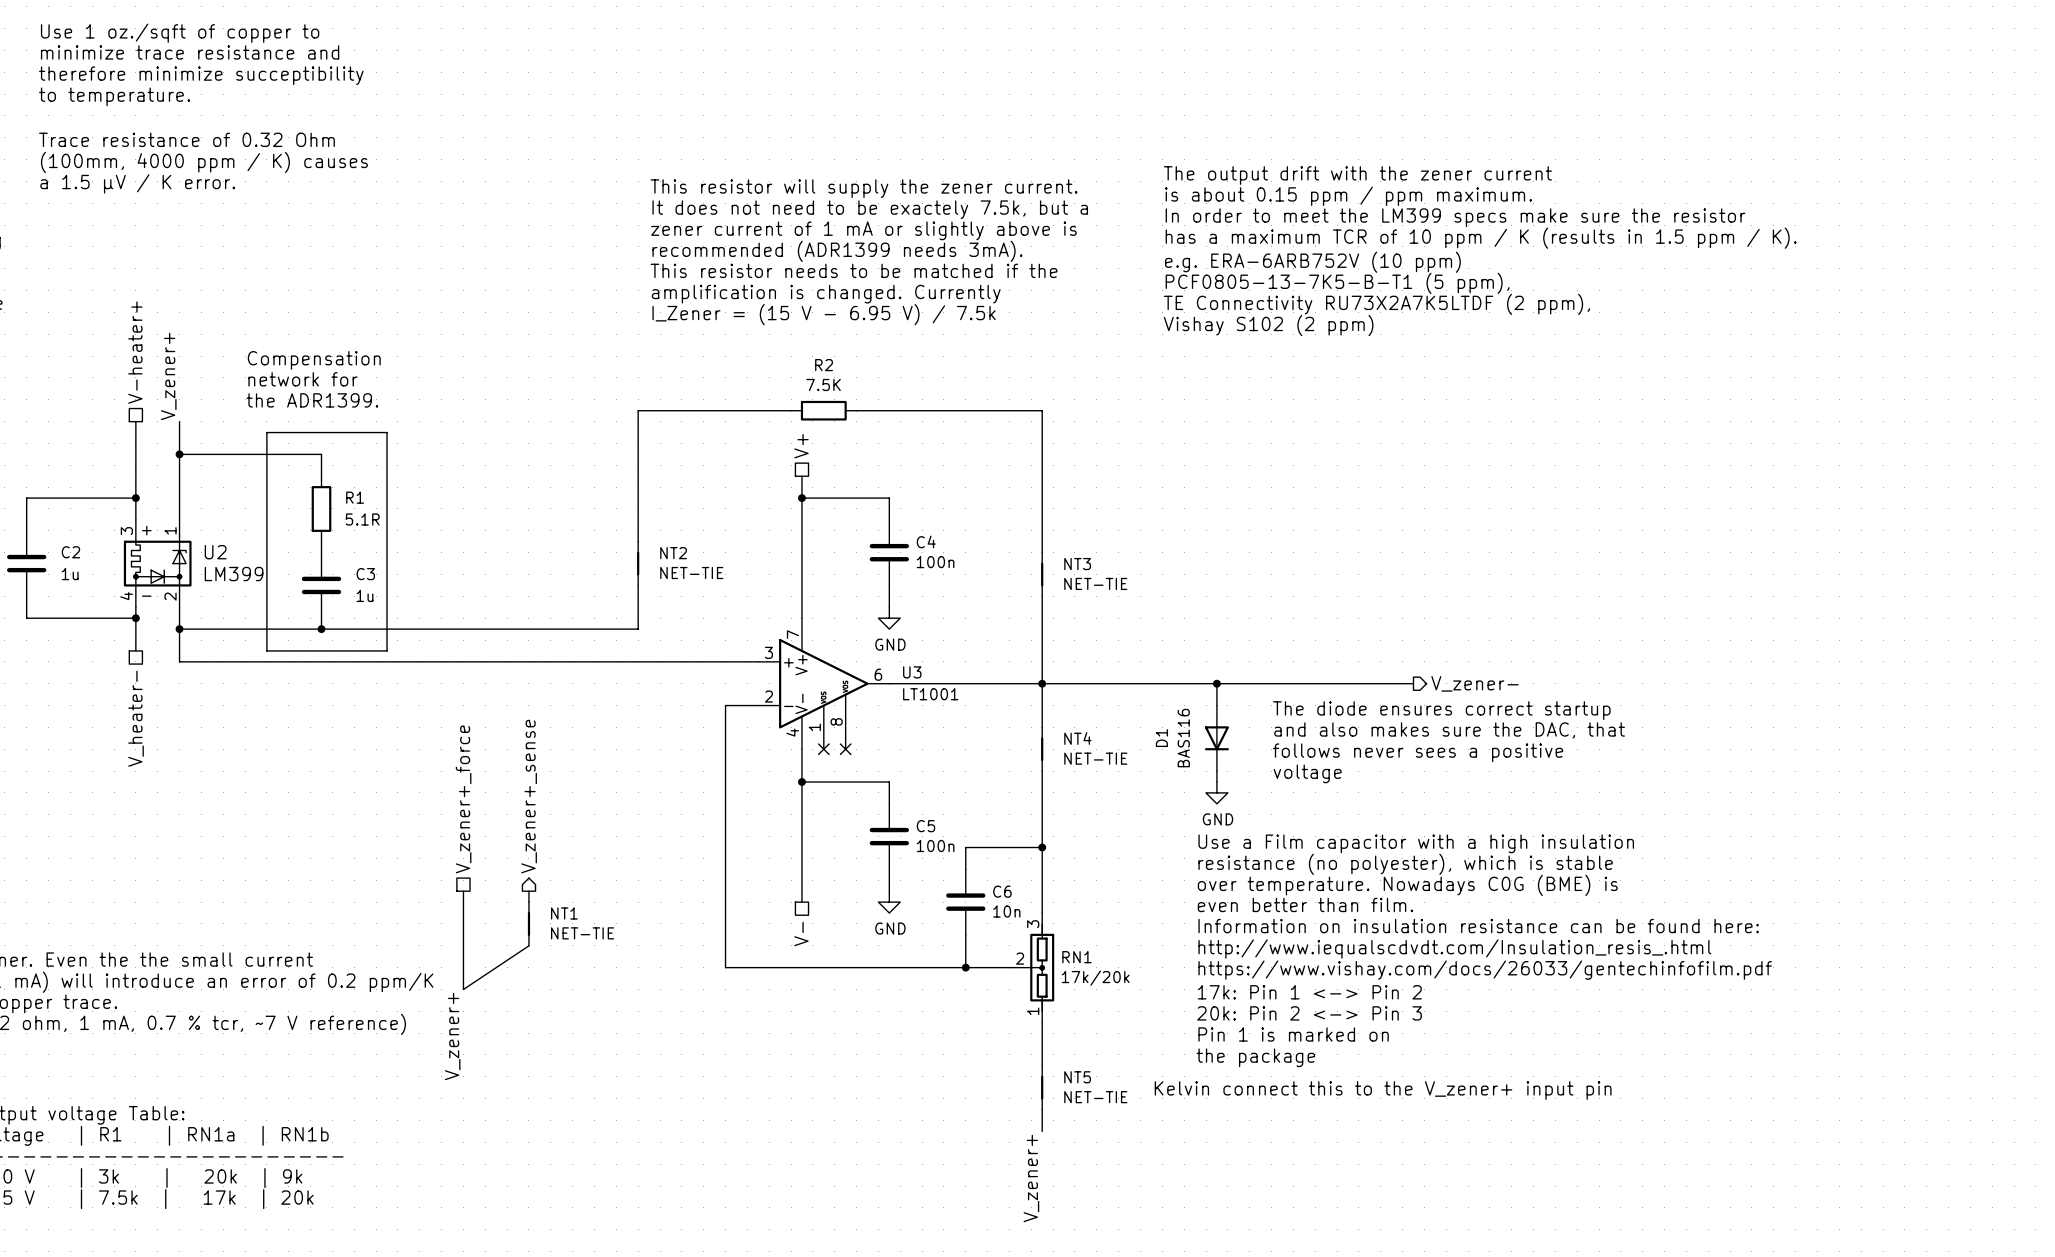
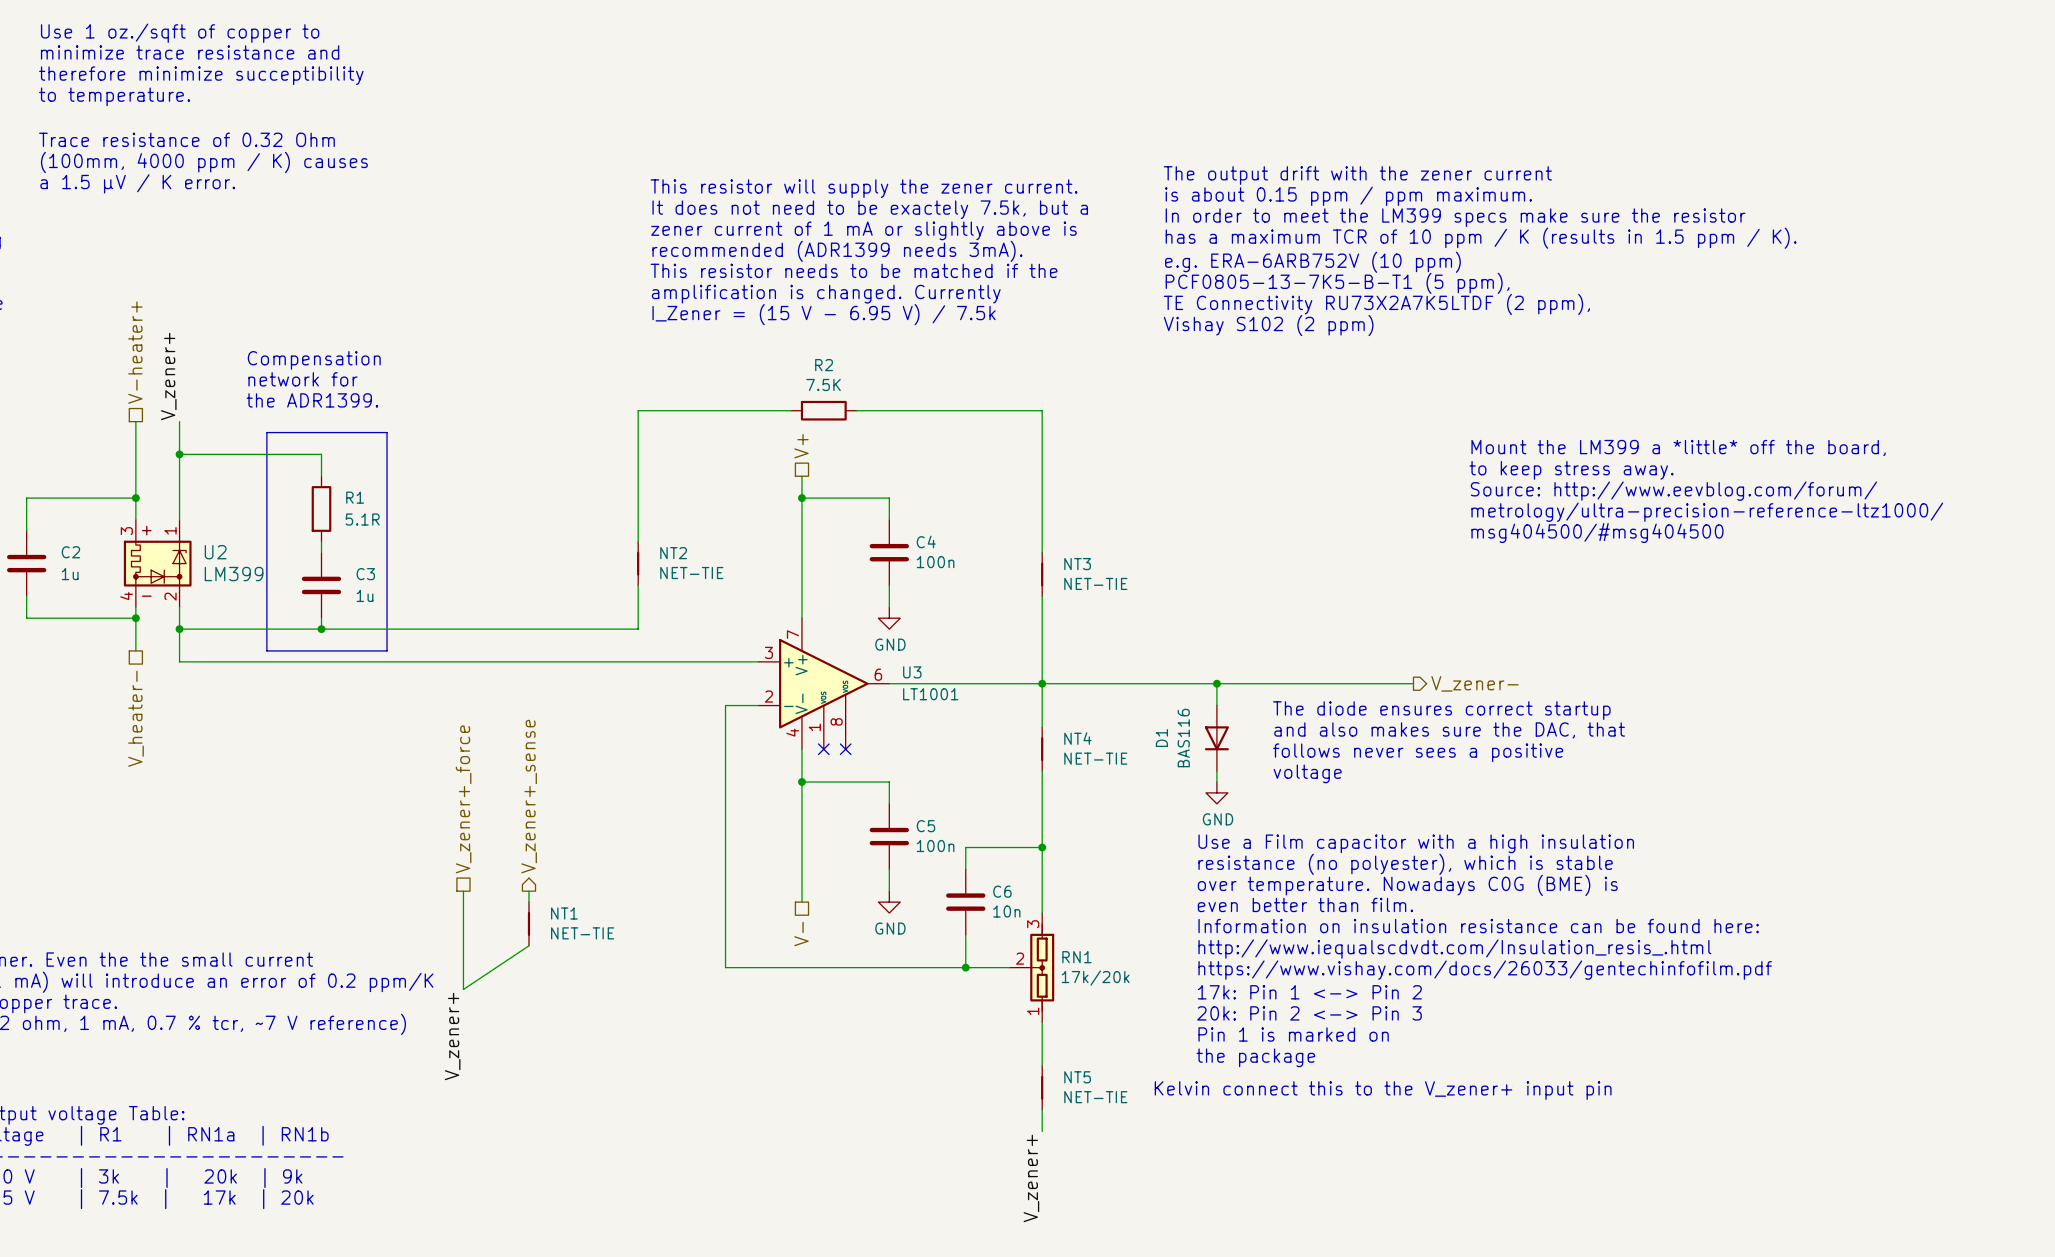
text: none -> Mount the LM399 a *little* off the board, (1678, 448)
text: none -> to keep stress away. (1571, 470)
text: none -> Source: http://www.eevblog.com/forum/ (1673, 491)
text: none -> metrology/ultra-precision-reference-ltz1000/ (1707, 512)
text: none -> msg404500/#msg404500 (1597, 533)

